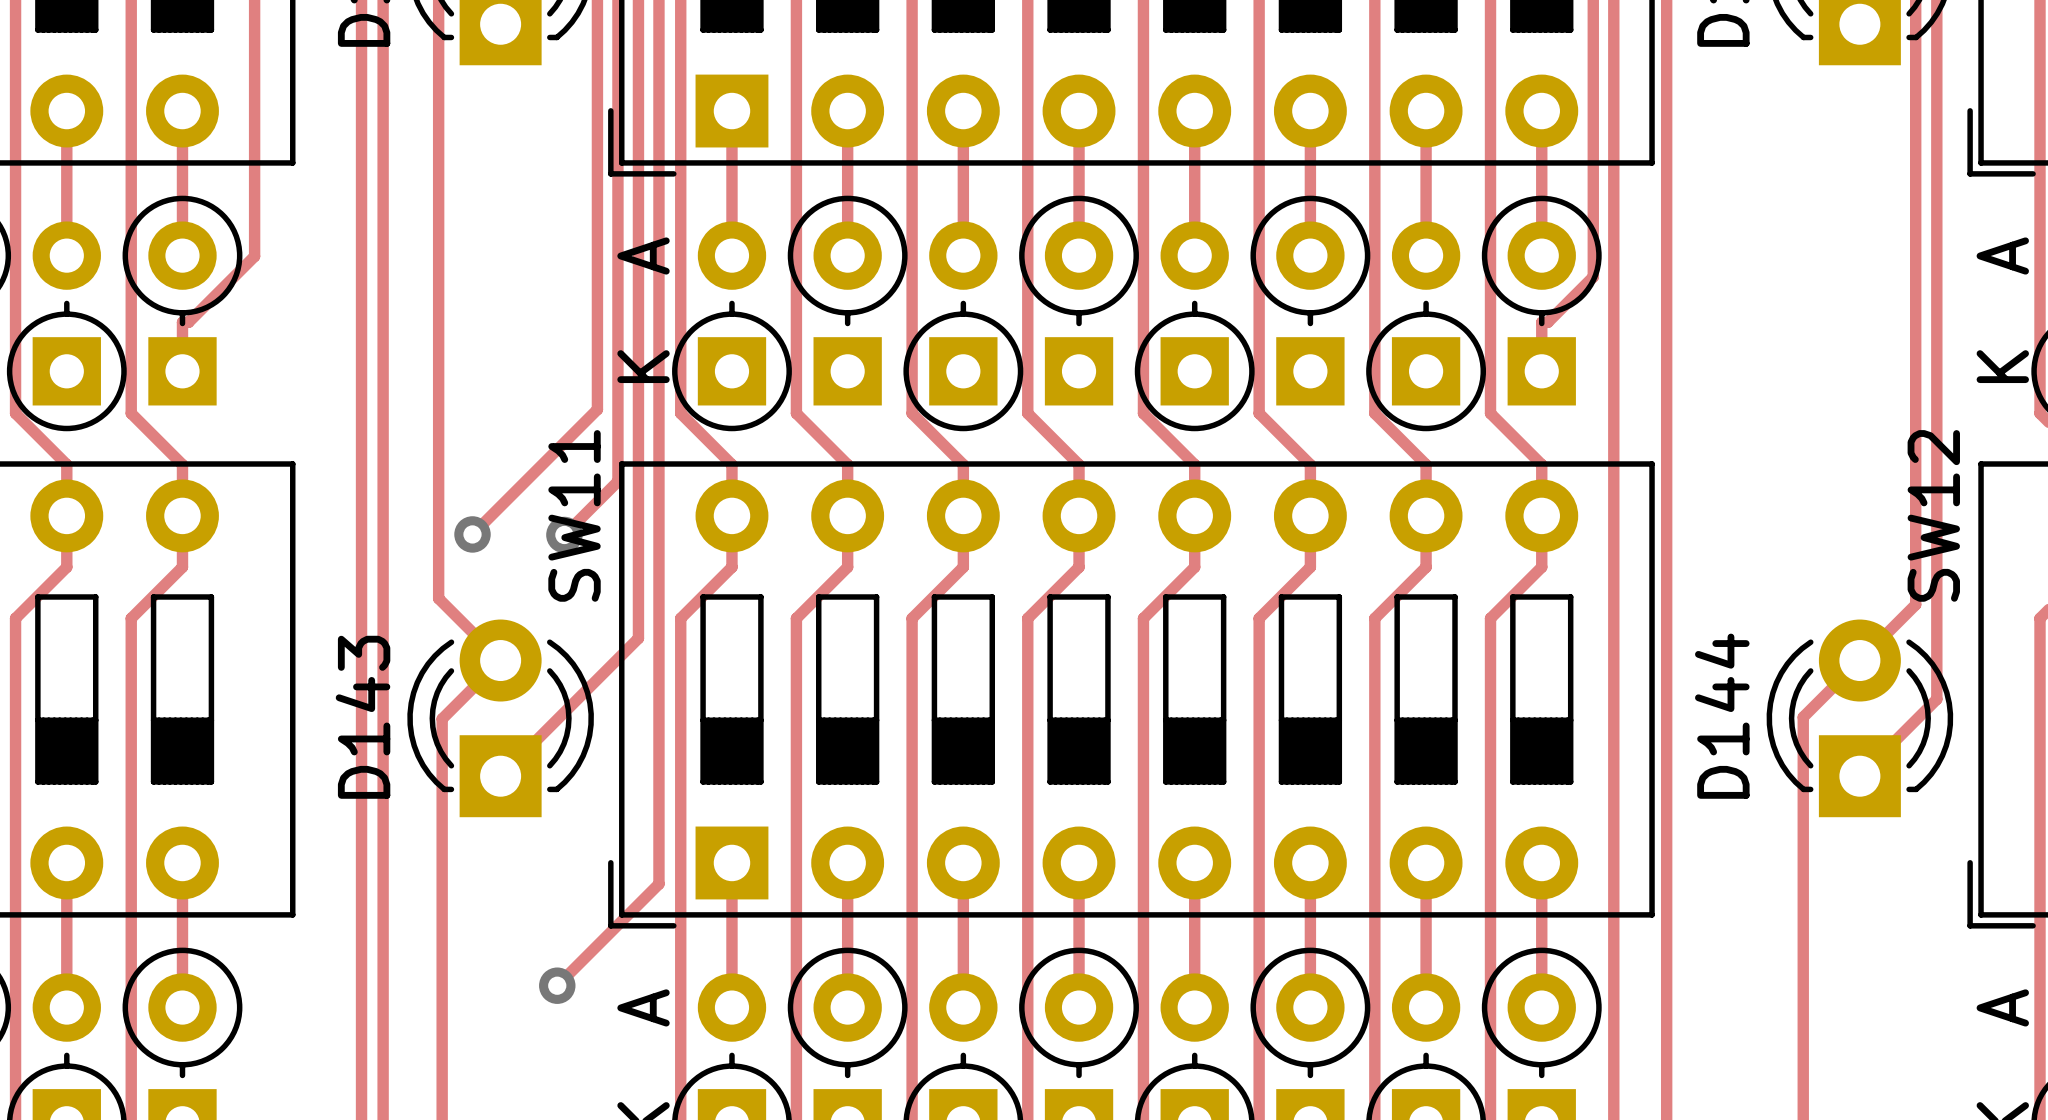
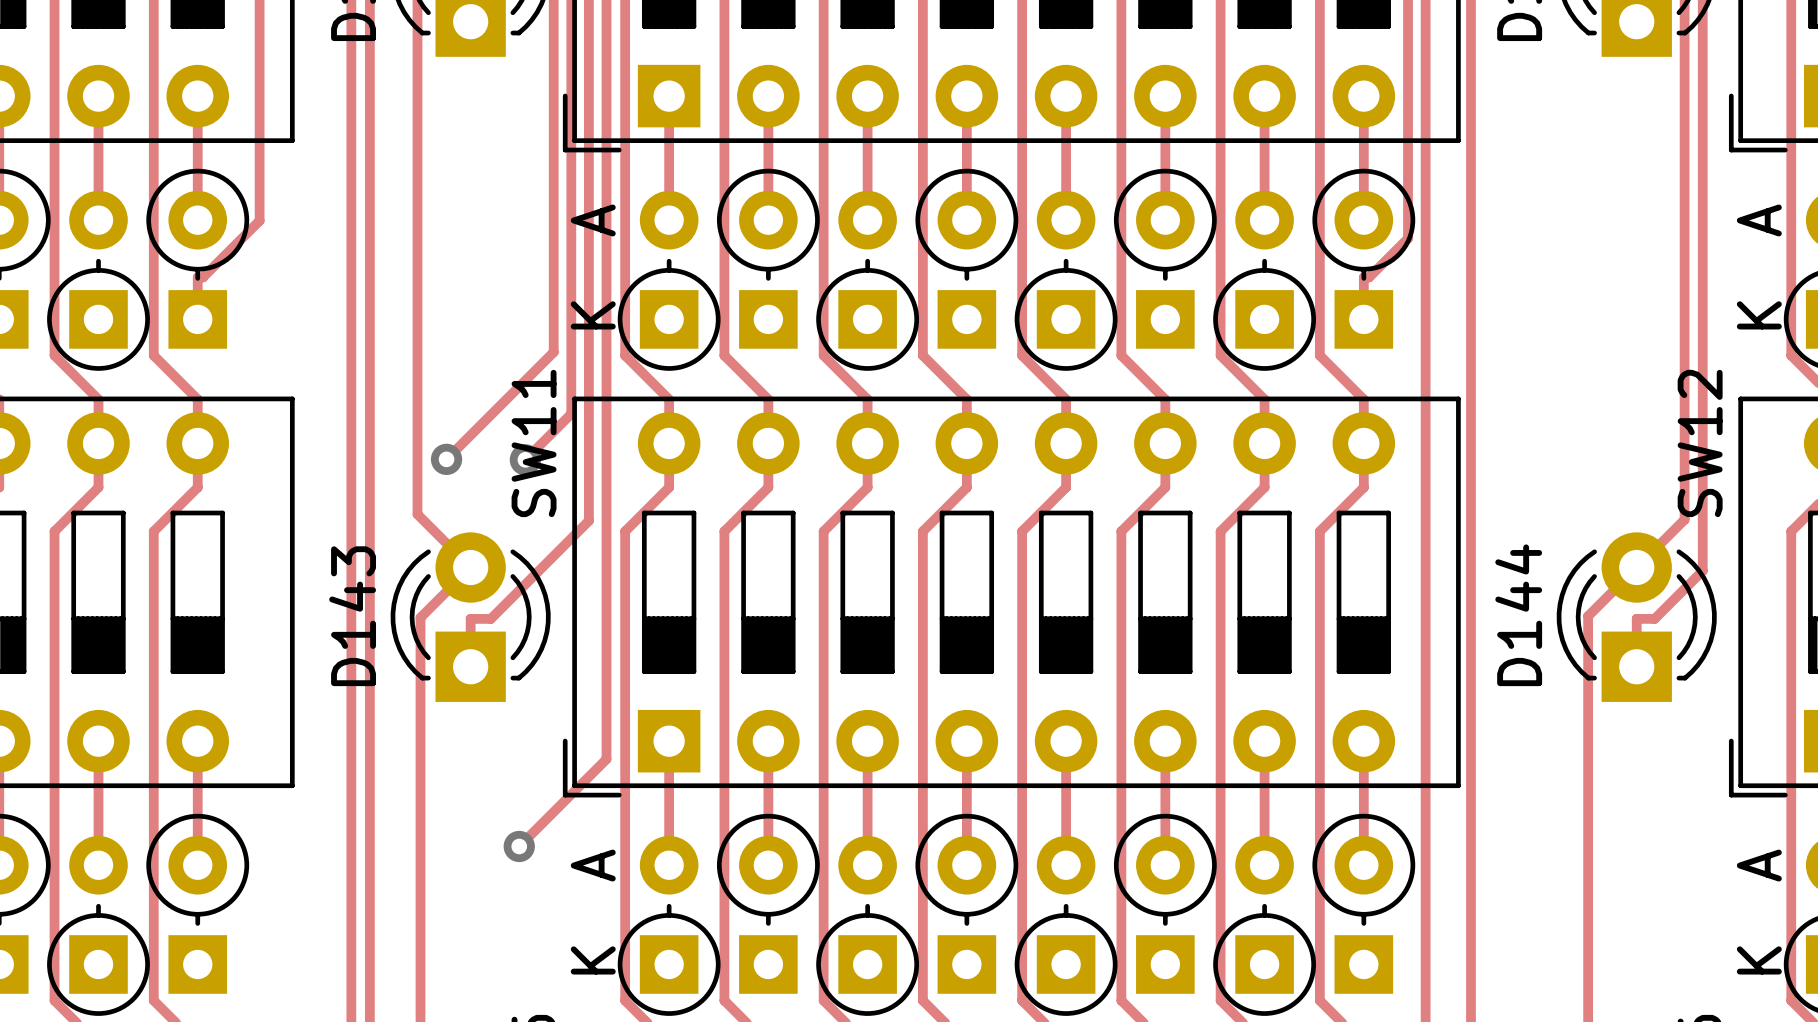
track: (638, 606) (638, 638) (500, 776) -> (588, 520) (490, 618) (470, 618) (470, 666)
track: (1936, 664) (1936, 699) (1859, 776) -> (1702, 570) (1654, 618) (1636, 618) (1636, 666)

